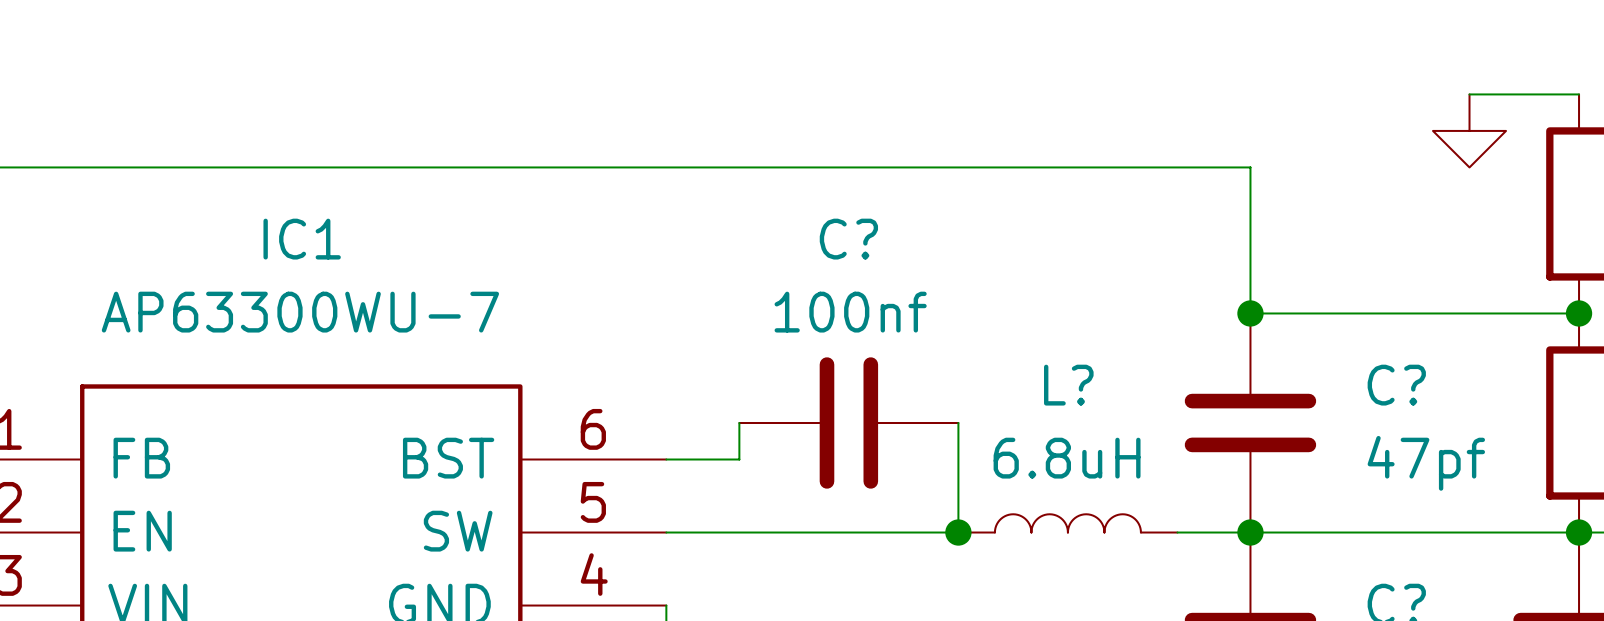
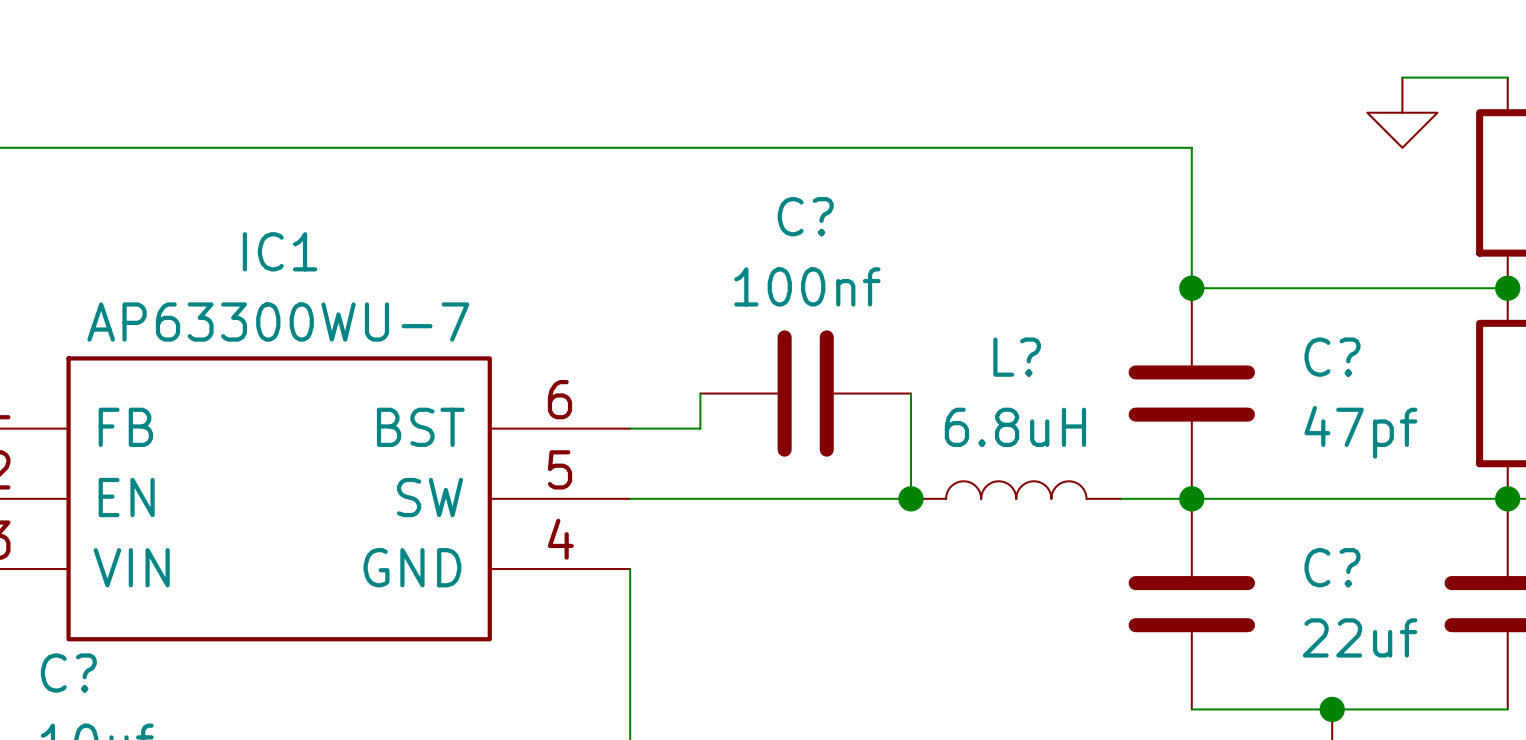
IC1 name position: IC1 (302, 239) -> IC1 (280, 251)
IC1 value position: AP63300WU-7 (300, 312) -> AP63300WU-7 (278, 322)

